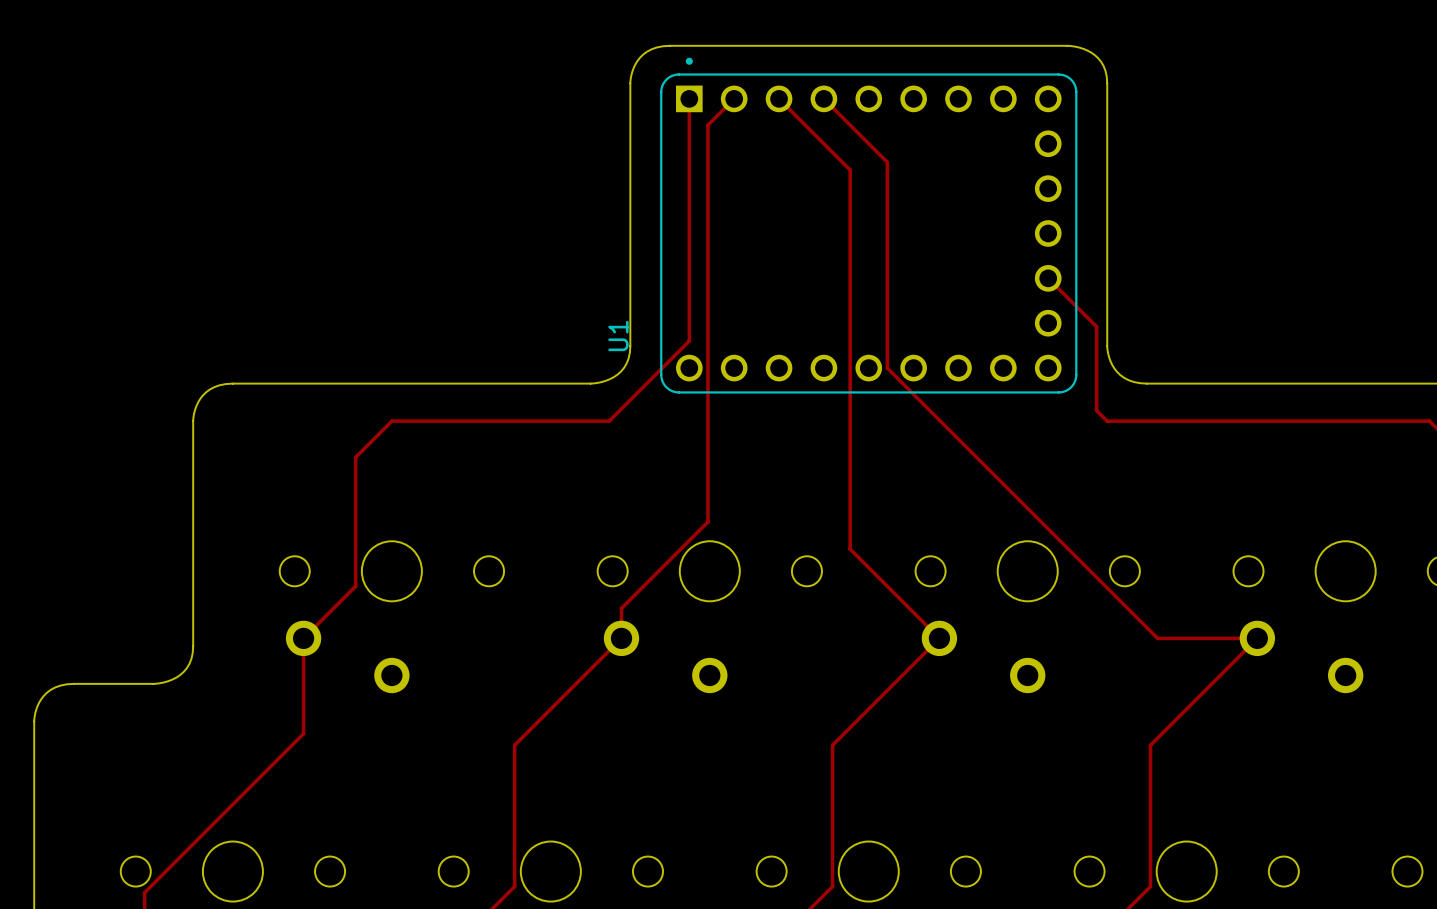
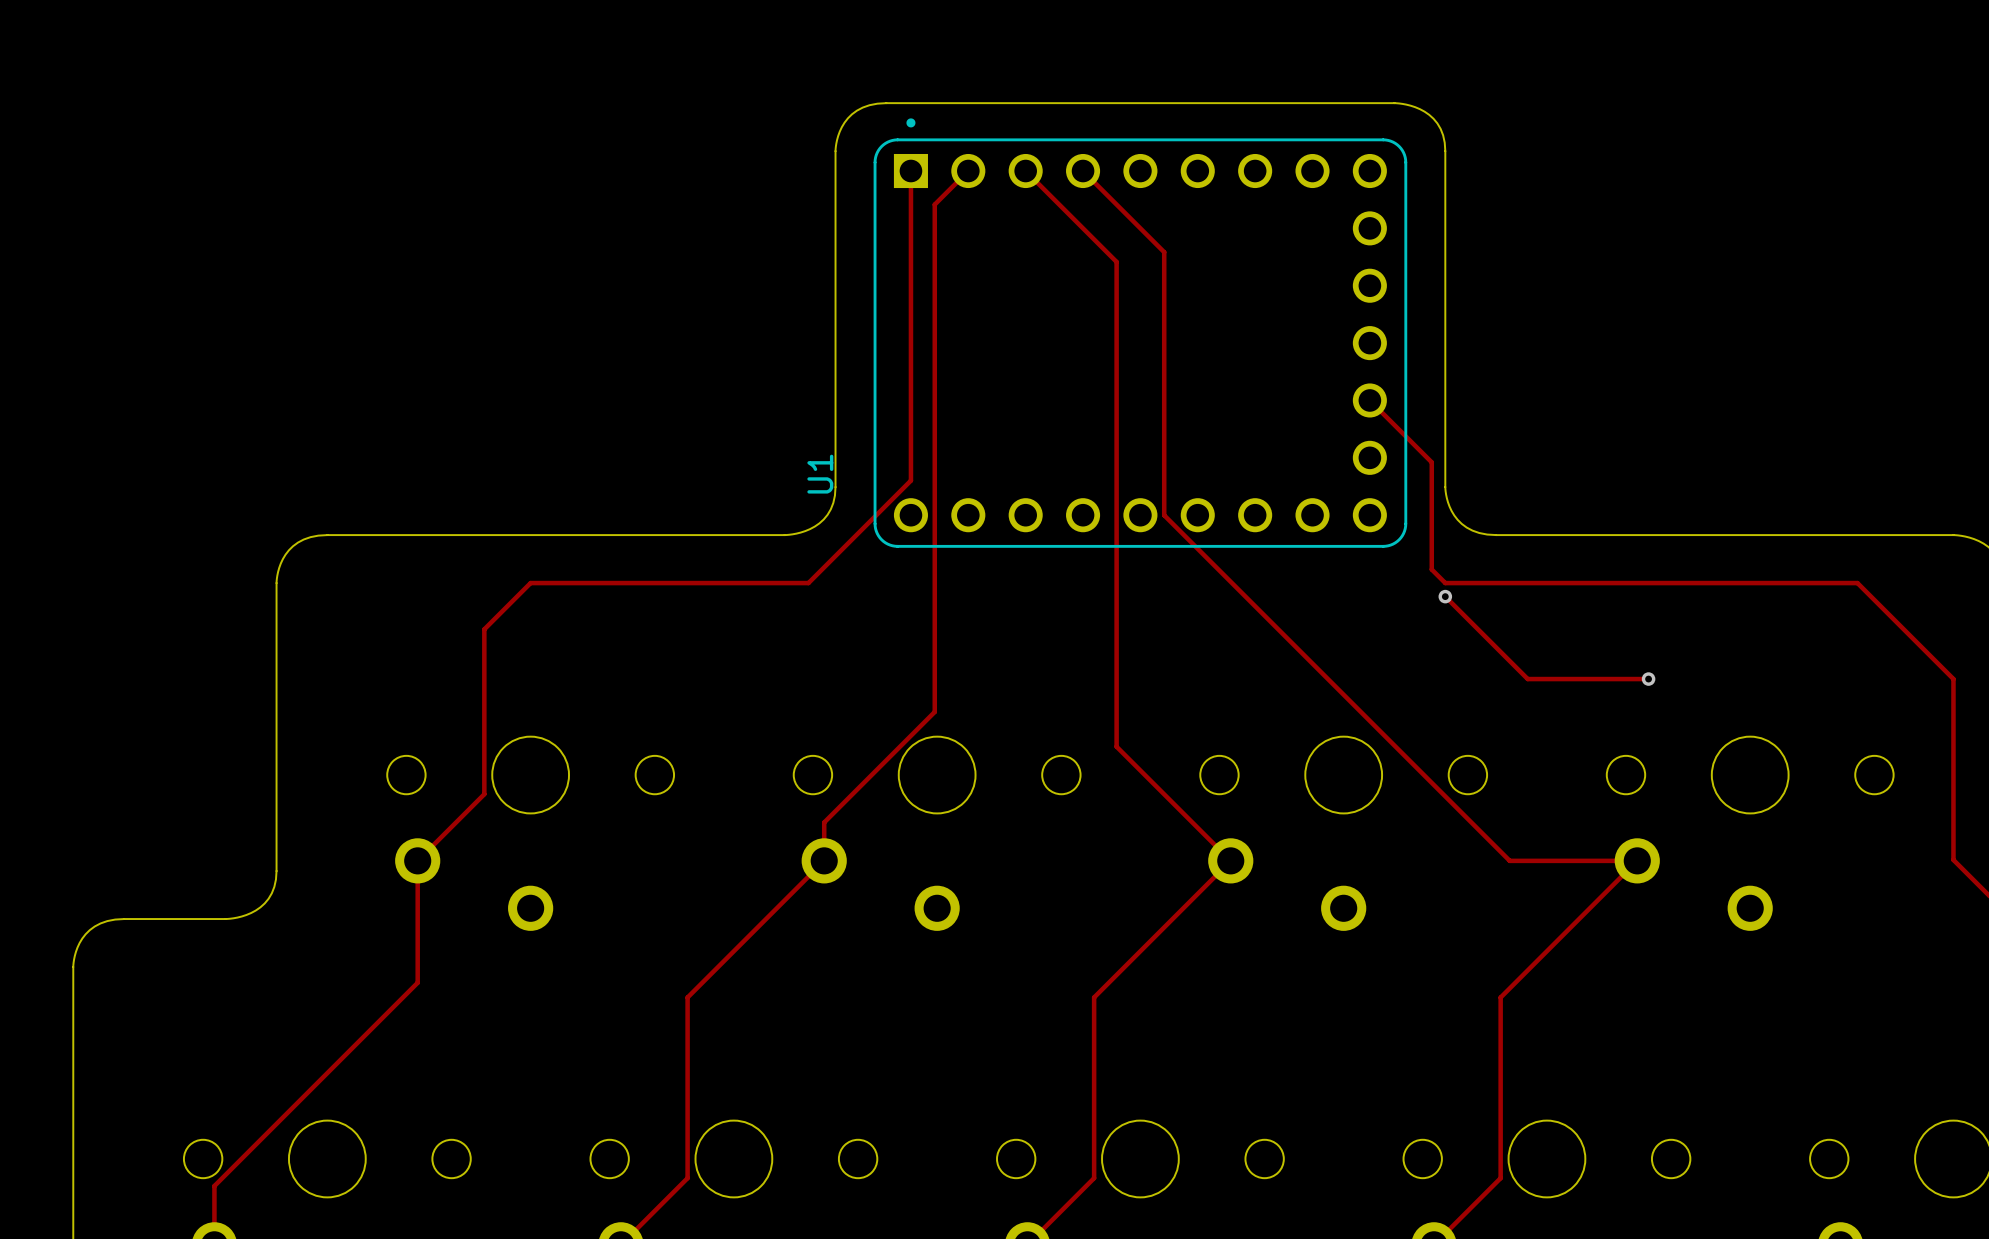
track: none -> (1445, 596) (1527, 679) (1648, 679)
via: none -> (1445, 596)
via: none -> (1648, 679)

